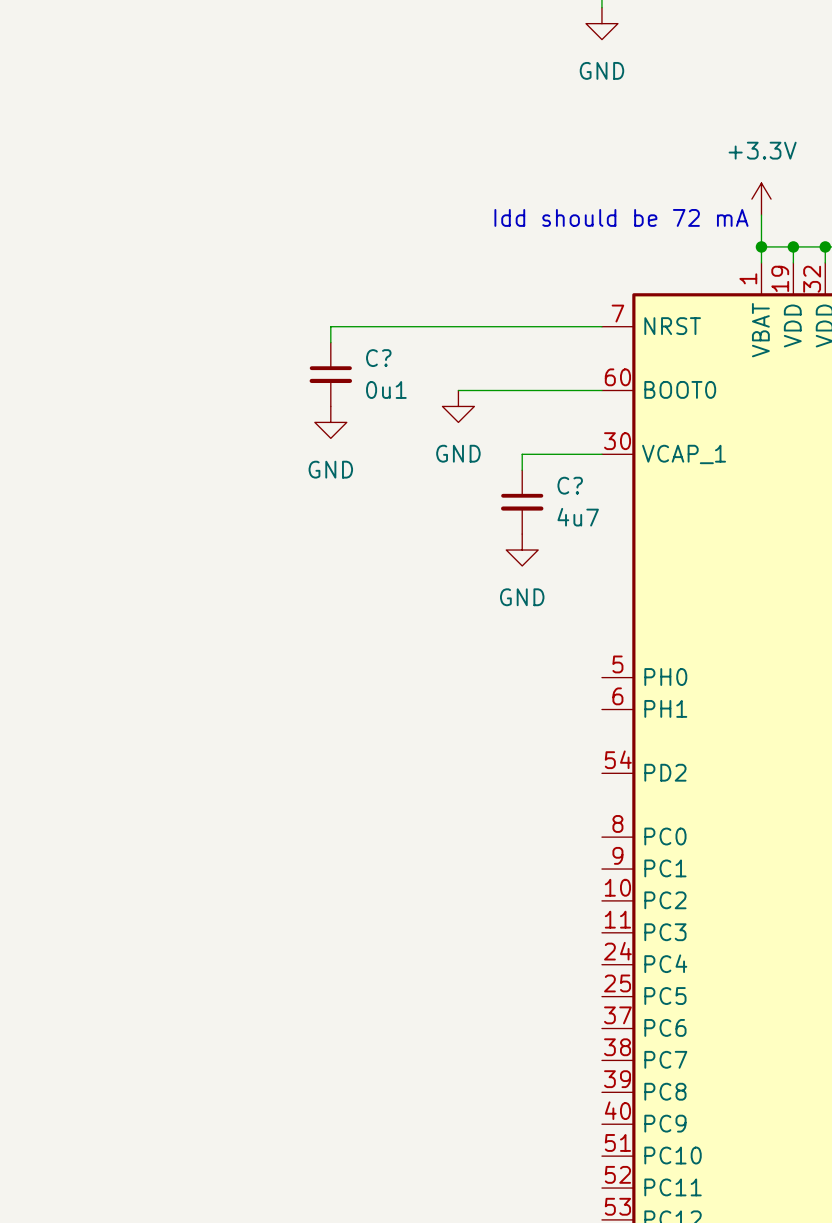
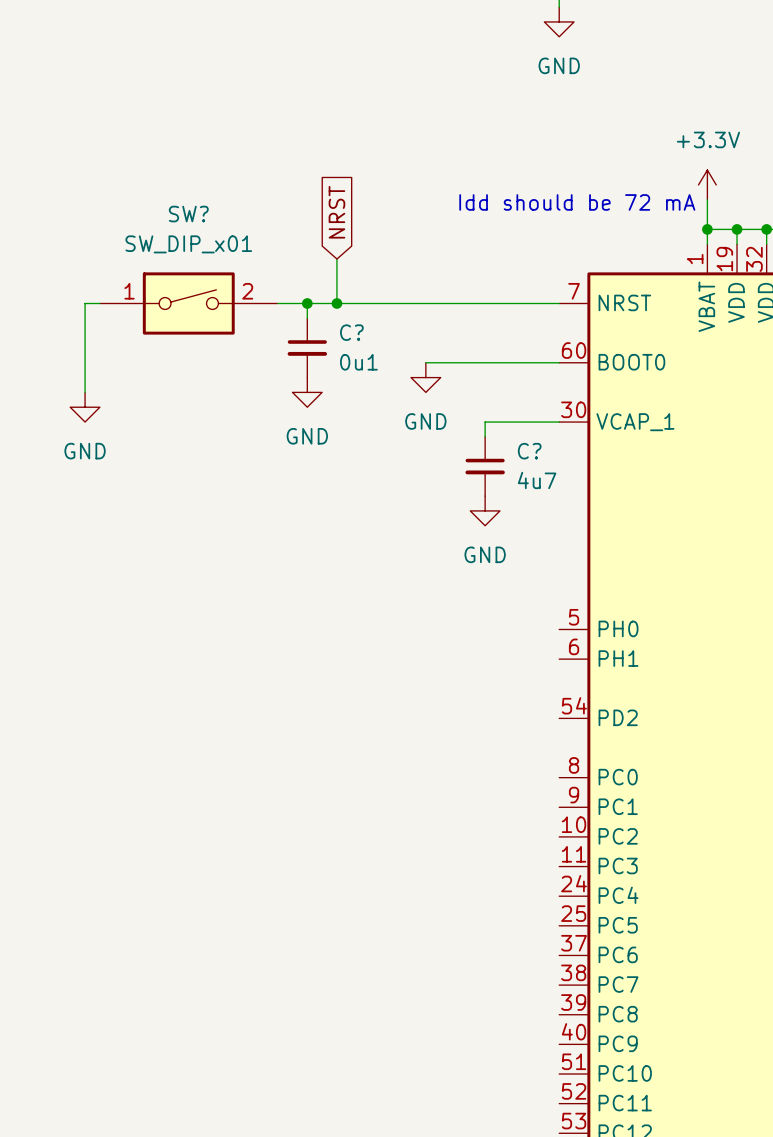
global label: none -> NRST (336, 212)
wire: none -> (336, 259) (336, 303)
wire: none -> (99, 303) (85, 303) (85, 392)
SW?: none -> SW_DIP_x01 (188, 303)
wire: none -> (277, 303) (307, 303)
junction: none -> (307, 303)
junction: none -> (336, 303)
power symbol: none -> GND (85, 407)

